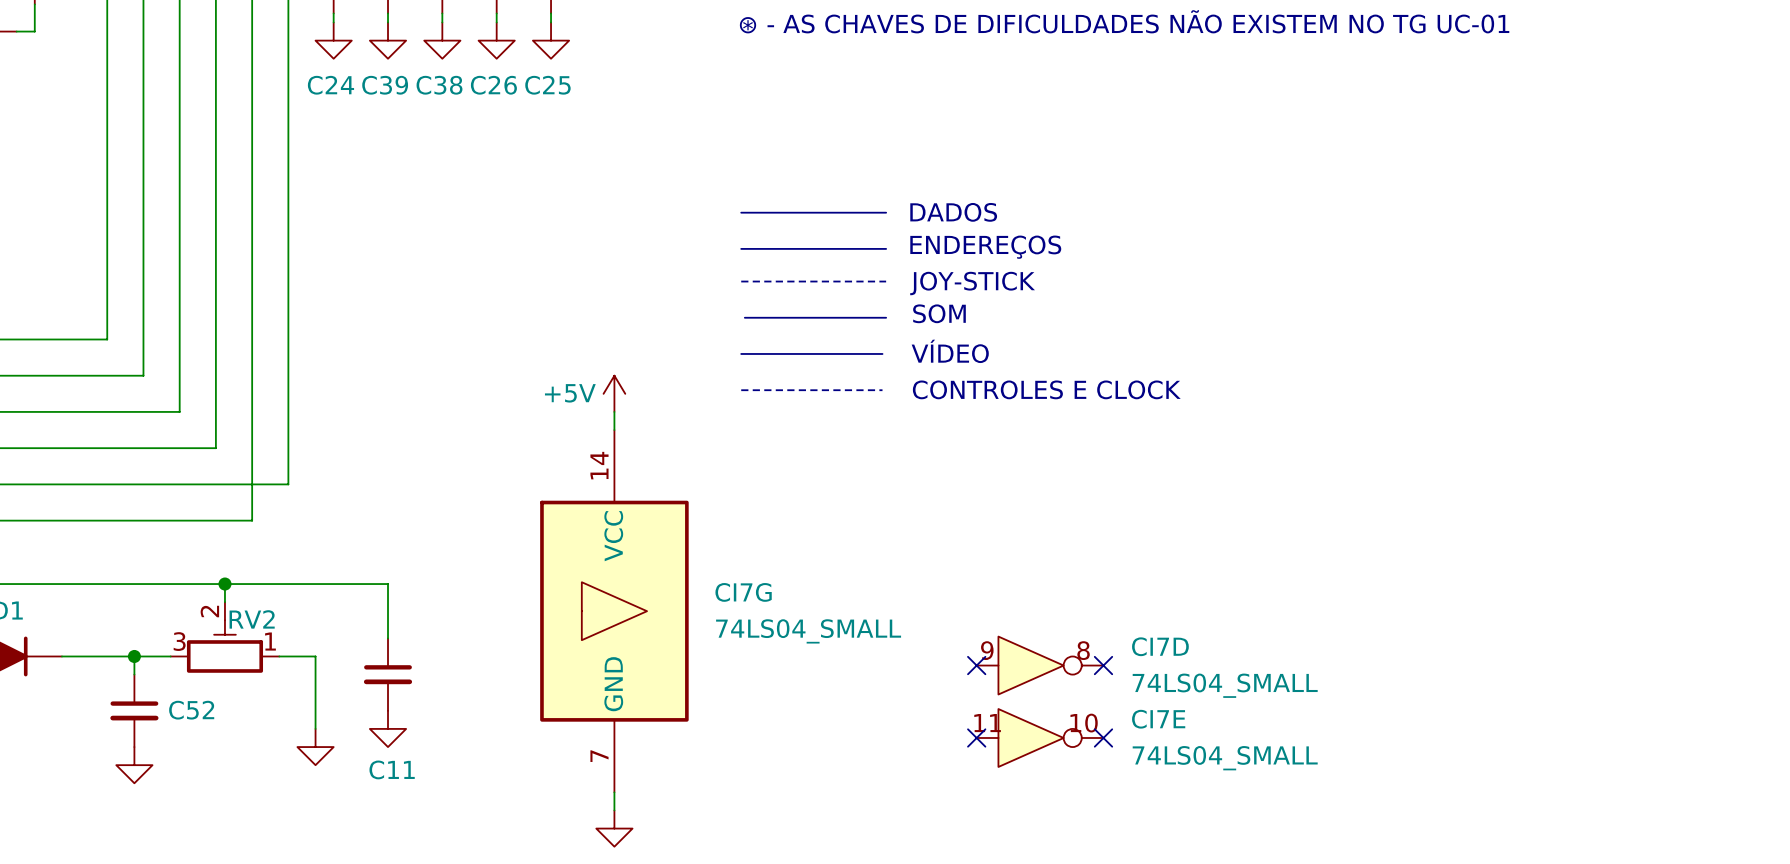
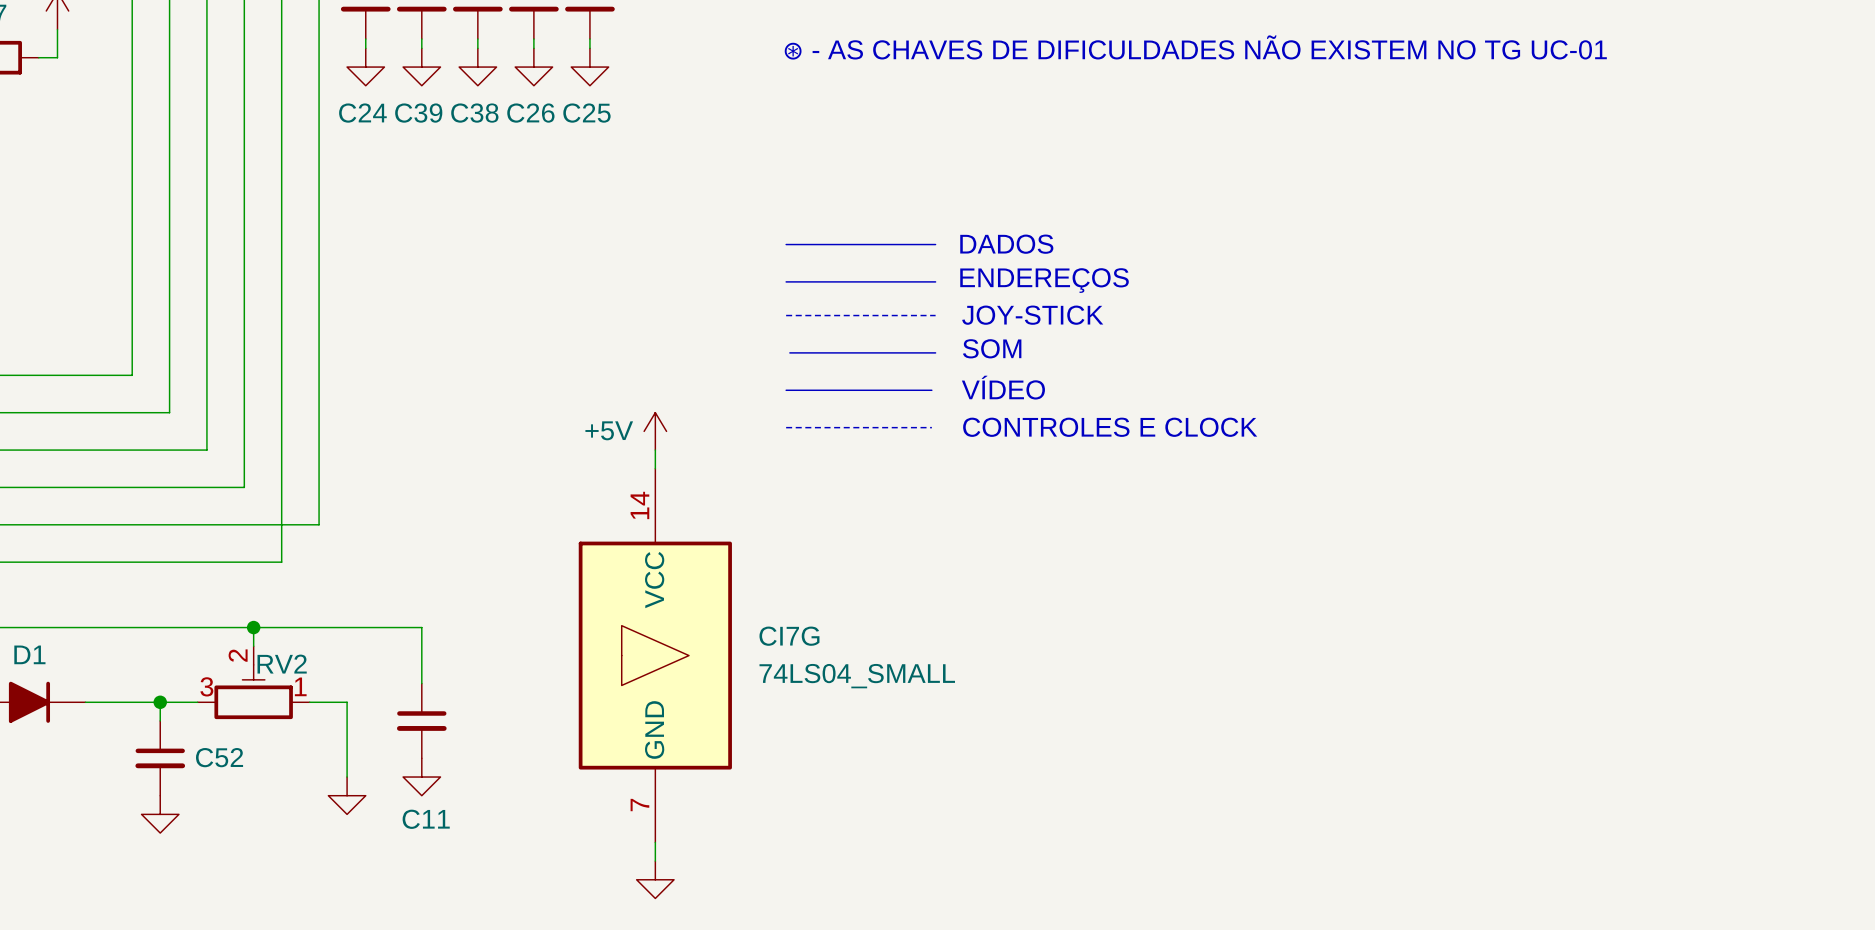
no-connect mark: (976, 665) -> none
CI7D: 74LS04_SMALL (1040, 665) -> none
no-connect mark: (1103, 665) -> none
no-connect mark: (976, 737) -> none
CI7E: 74LS04_SMALL (1040, 737) -> none
no-connect mark: (1103, 737) -> none

